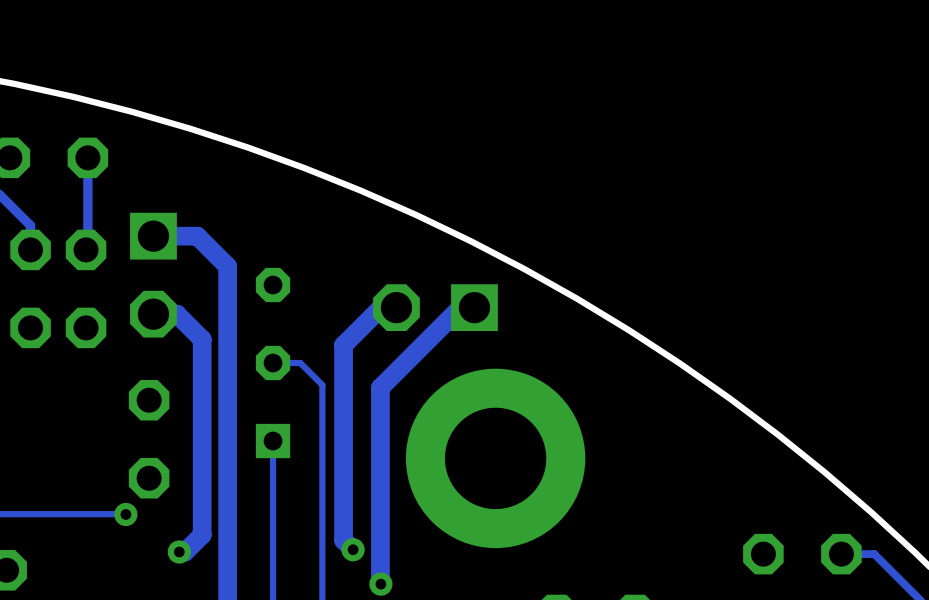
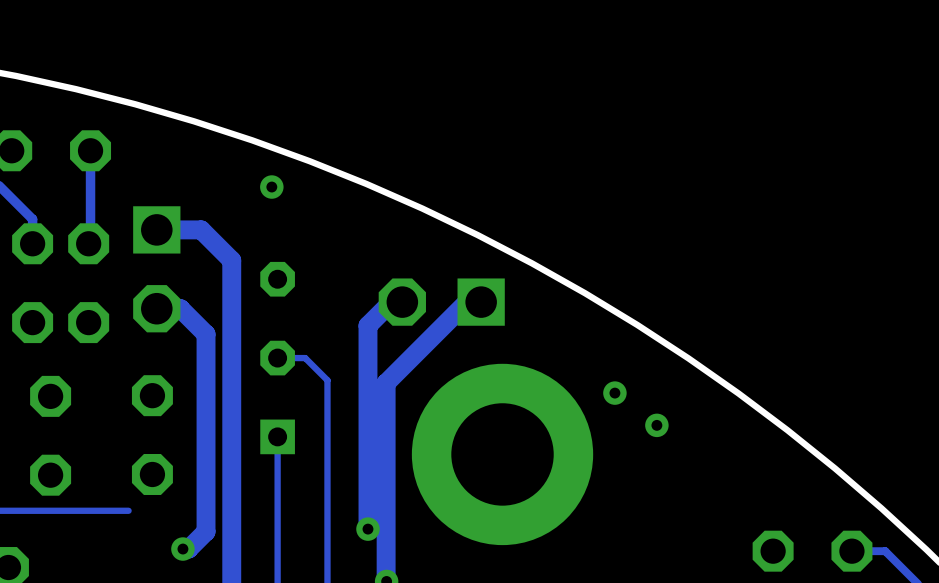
via: none -> (271, 187)
track: (385, 307) (381, 307) (343, 345) (343, 540) (353, 549) -> (391, 302) (367, 325) (367, 529)
via: none -> (614, 393)
via: none -> (656, 425)
part: none -> (50, 435)
via: (125, 514) -> none
via position: (353, 549) -> (367, 529)

